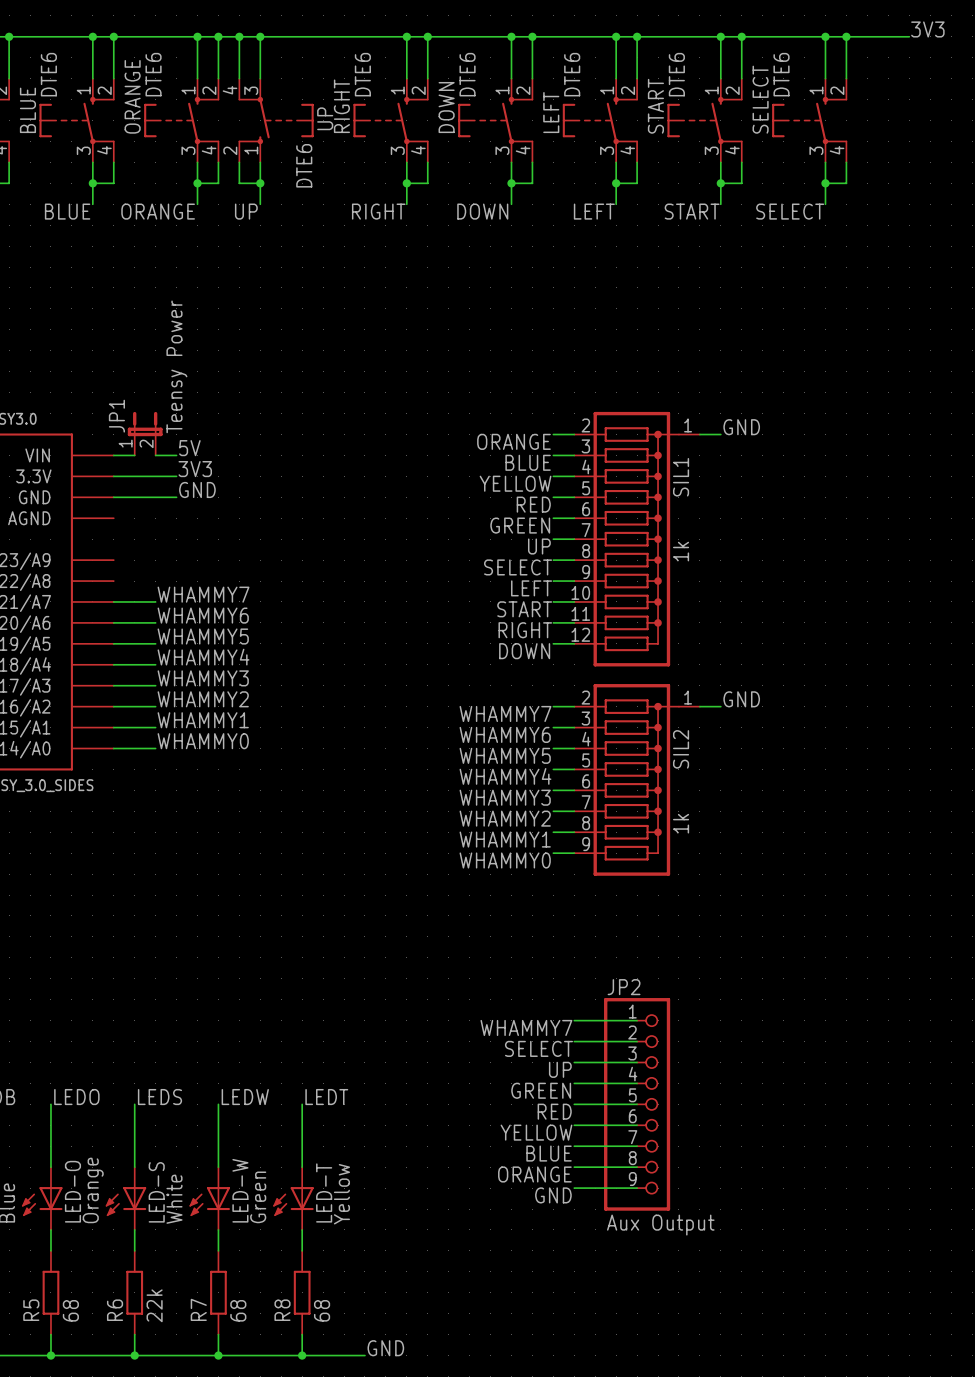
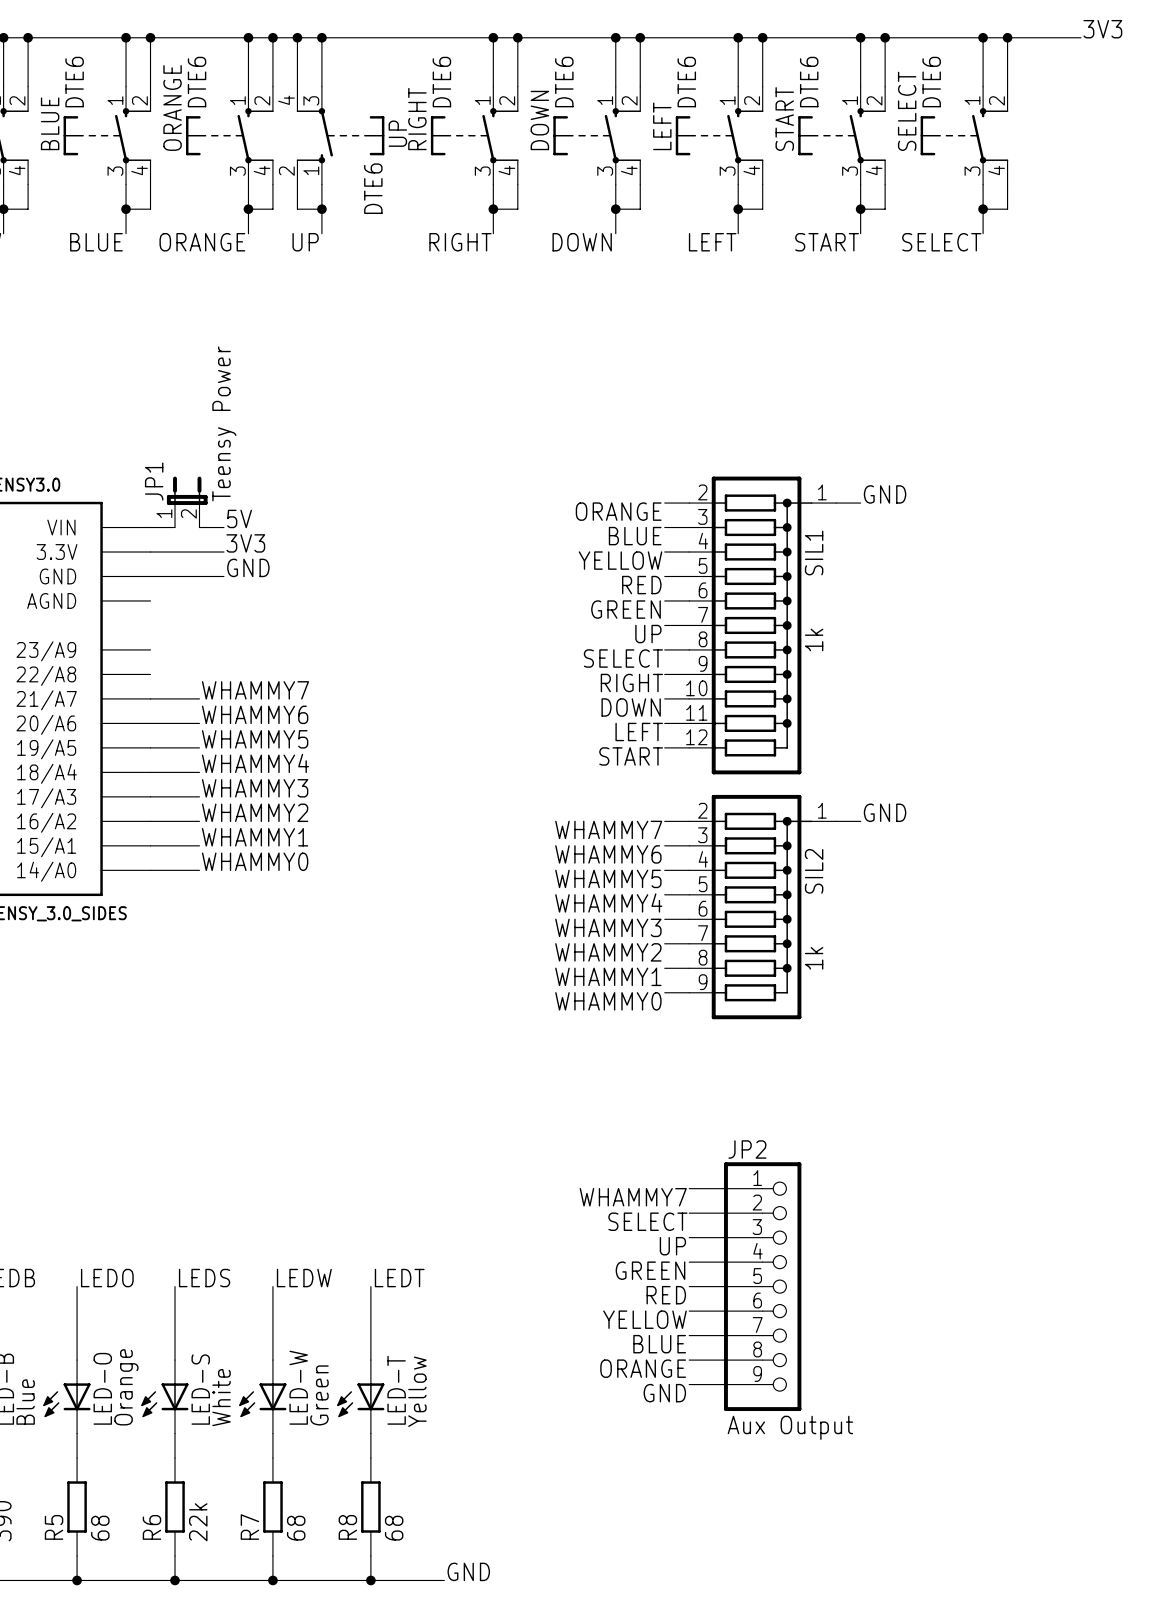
label: LEFT (531, 588) -> RIGHT (631, 683)
label: START (524, 609) -> DOWN (631, 707)
label: RIGHT (525, 630) -> LEFT (639, 731)
label: DOWN (524, 651) -> START (631, 756)

